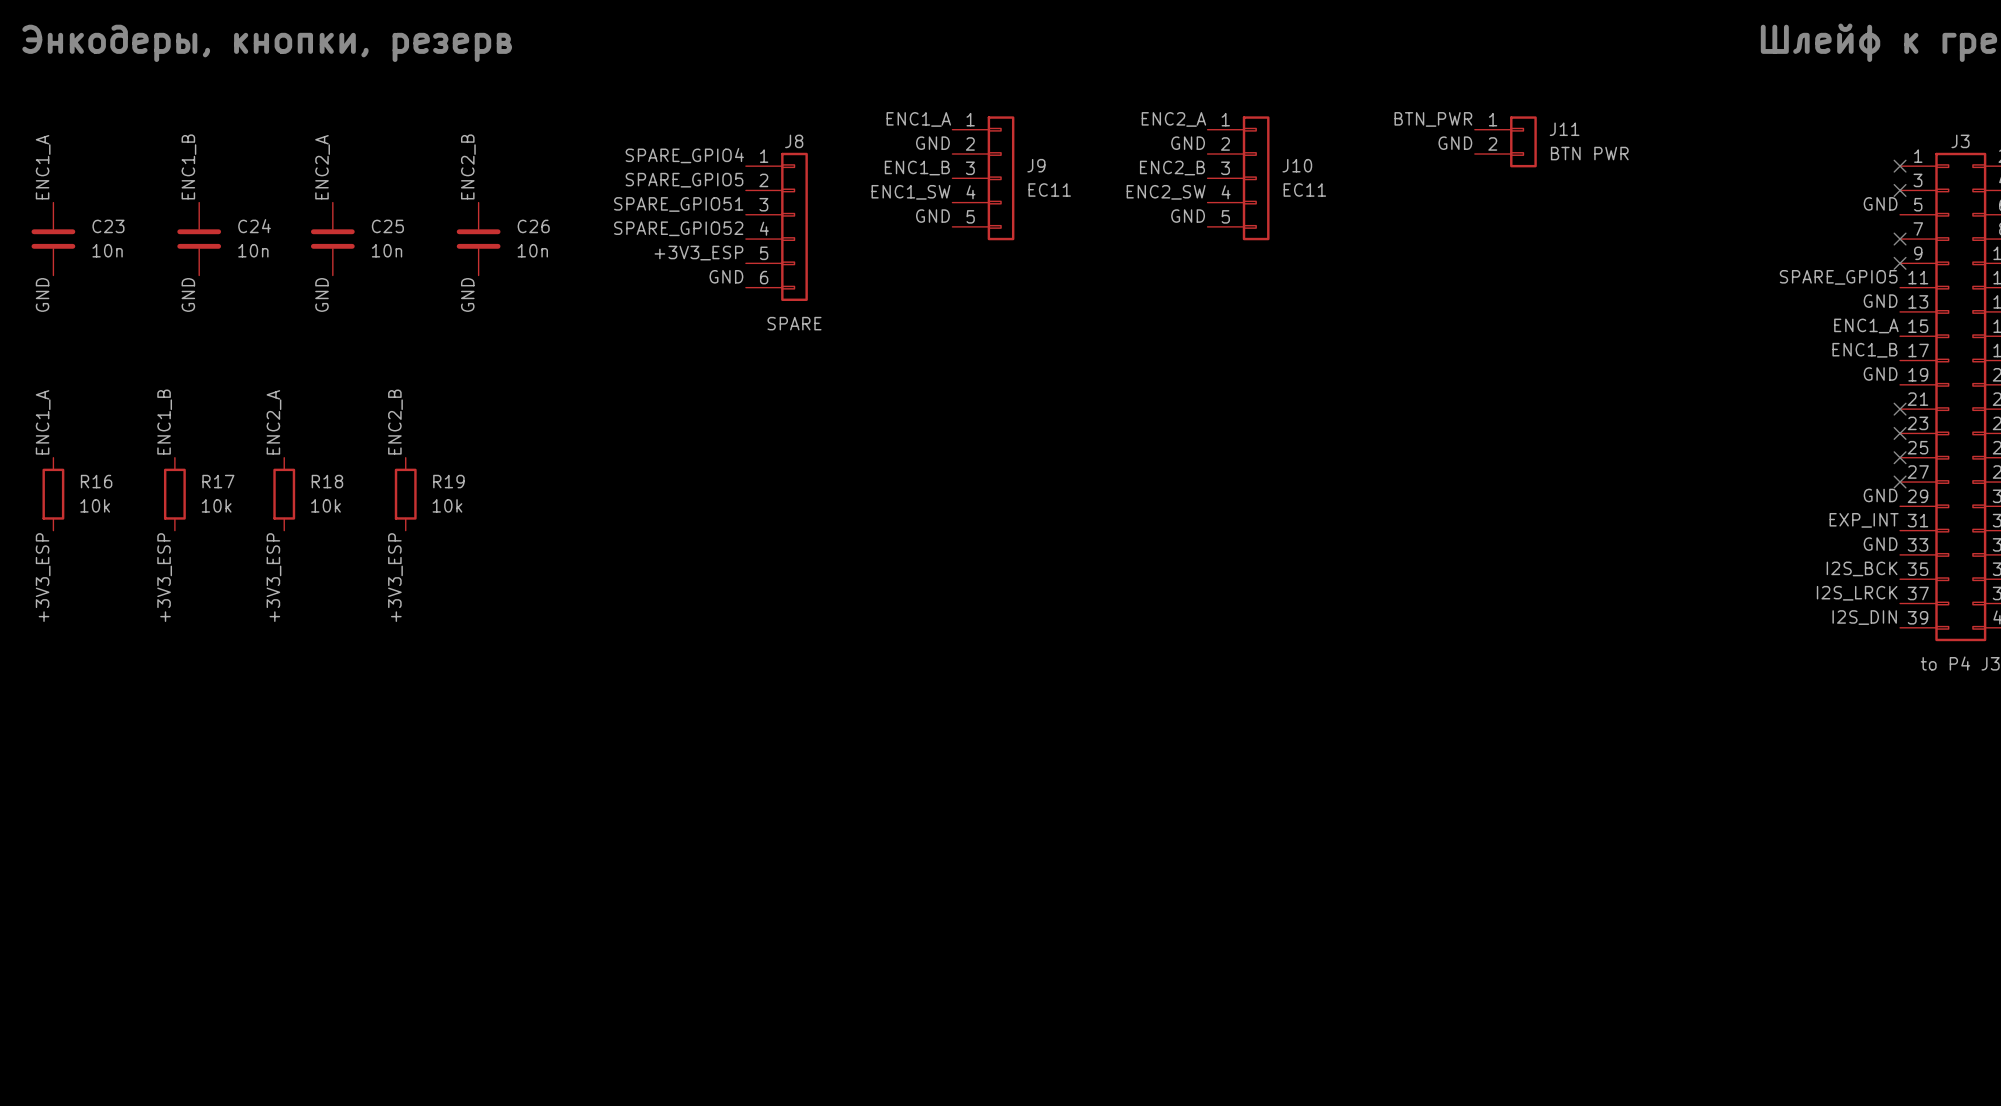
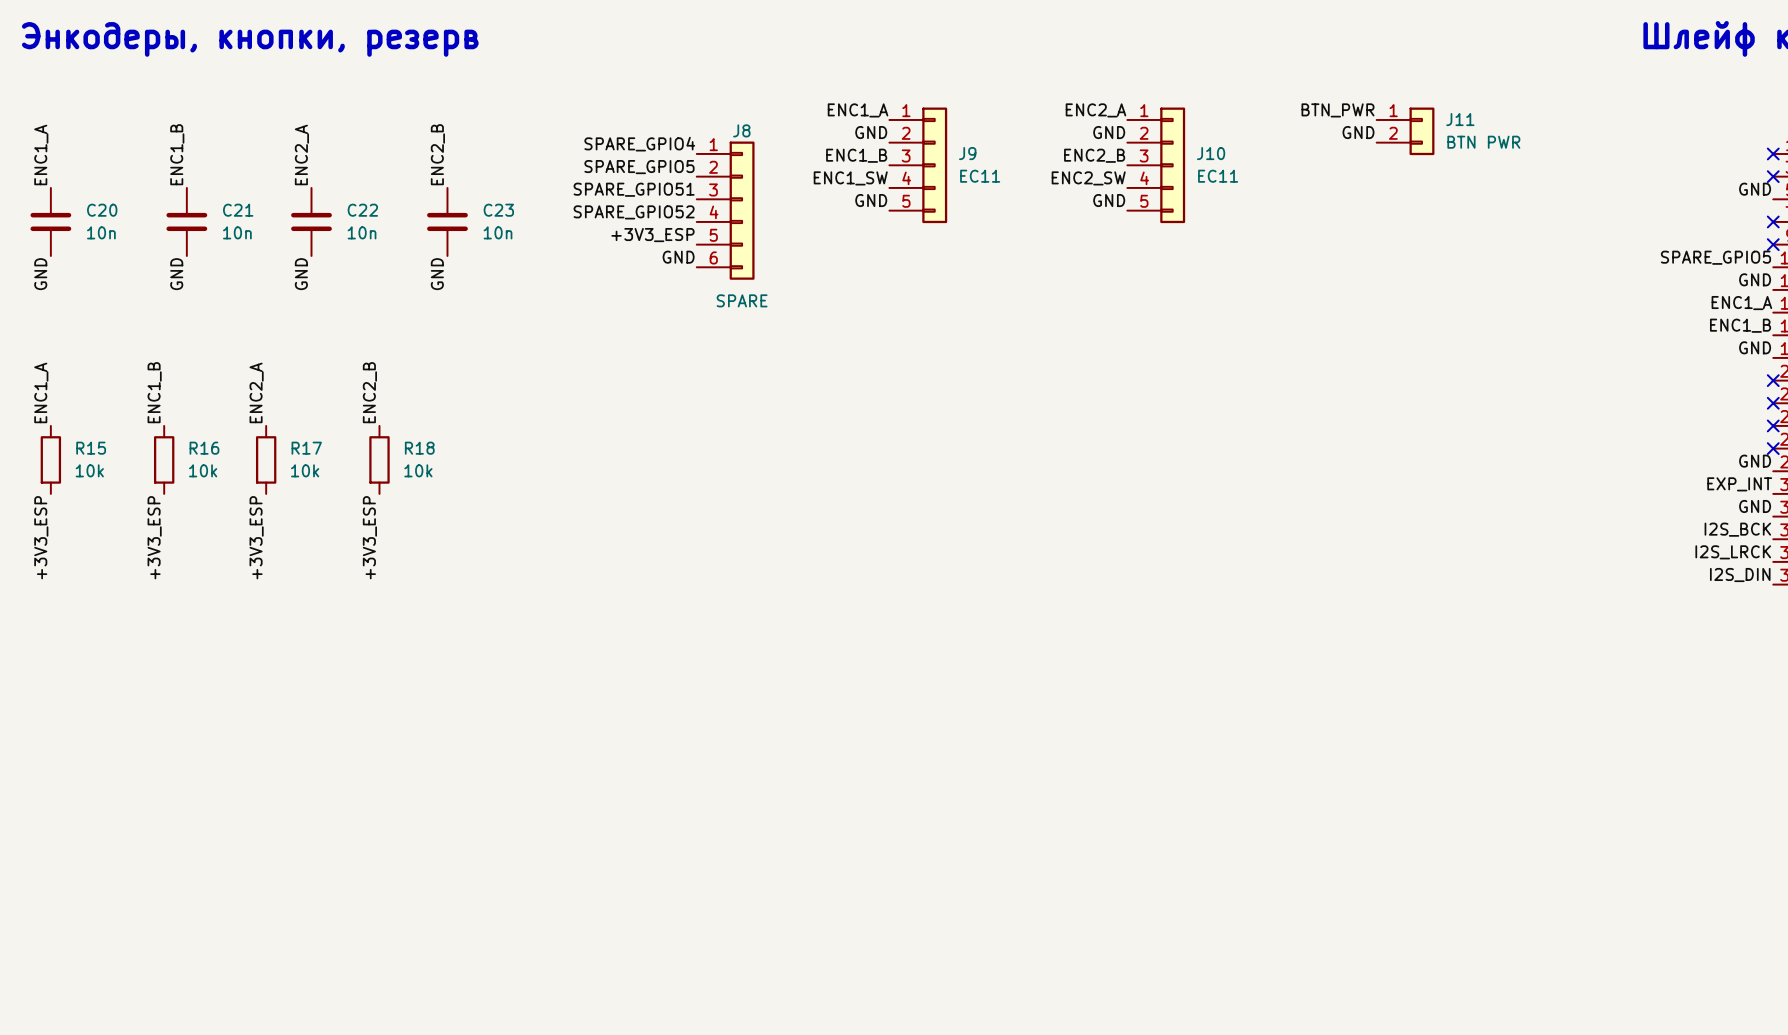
C23 name: C23 (108, 226) -> C20 (102, 210)
C24 name: C24 (254, 226) -> C21 (238, 210)
C25 name: C25 (387, 226) -> C22 (362, 210)
C26 name: C26 (533, 226) -> C23 (498, 210)
R16 name: R16 (96, 481) -> R15 (91, 448)
R17 name: R17 (218, 481) -> R16 (204, 448)
R18 name: R18 (327, 481) -> R17 (306, 448)
R19 name: R19 (448, 481) -> R18 (419, 448)

